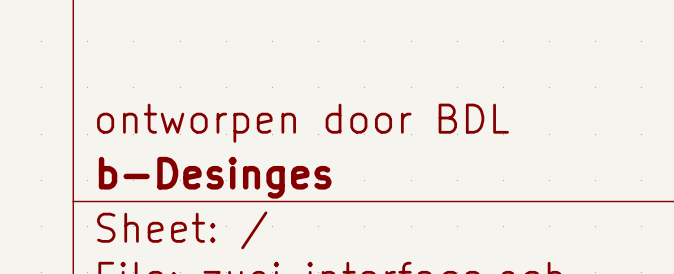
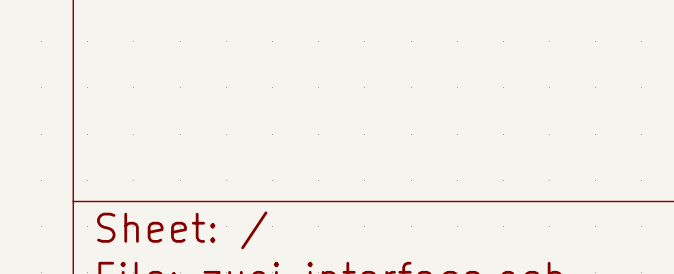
title block: ontworpen door BDL (303, 123) -> none
title block: b-Desinges (215, 177) -> none

